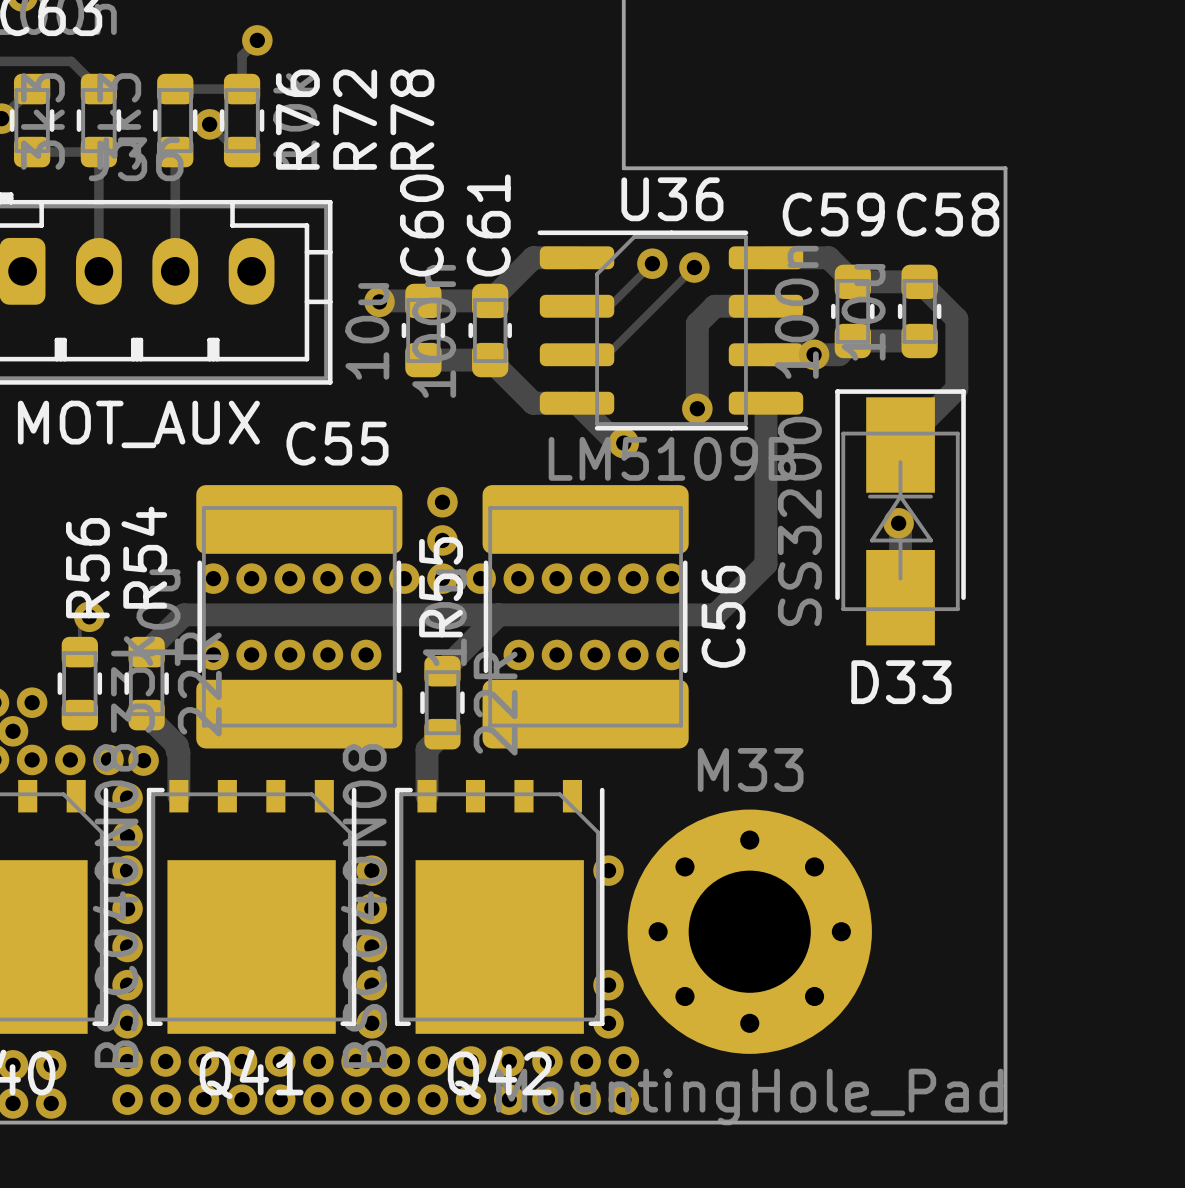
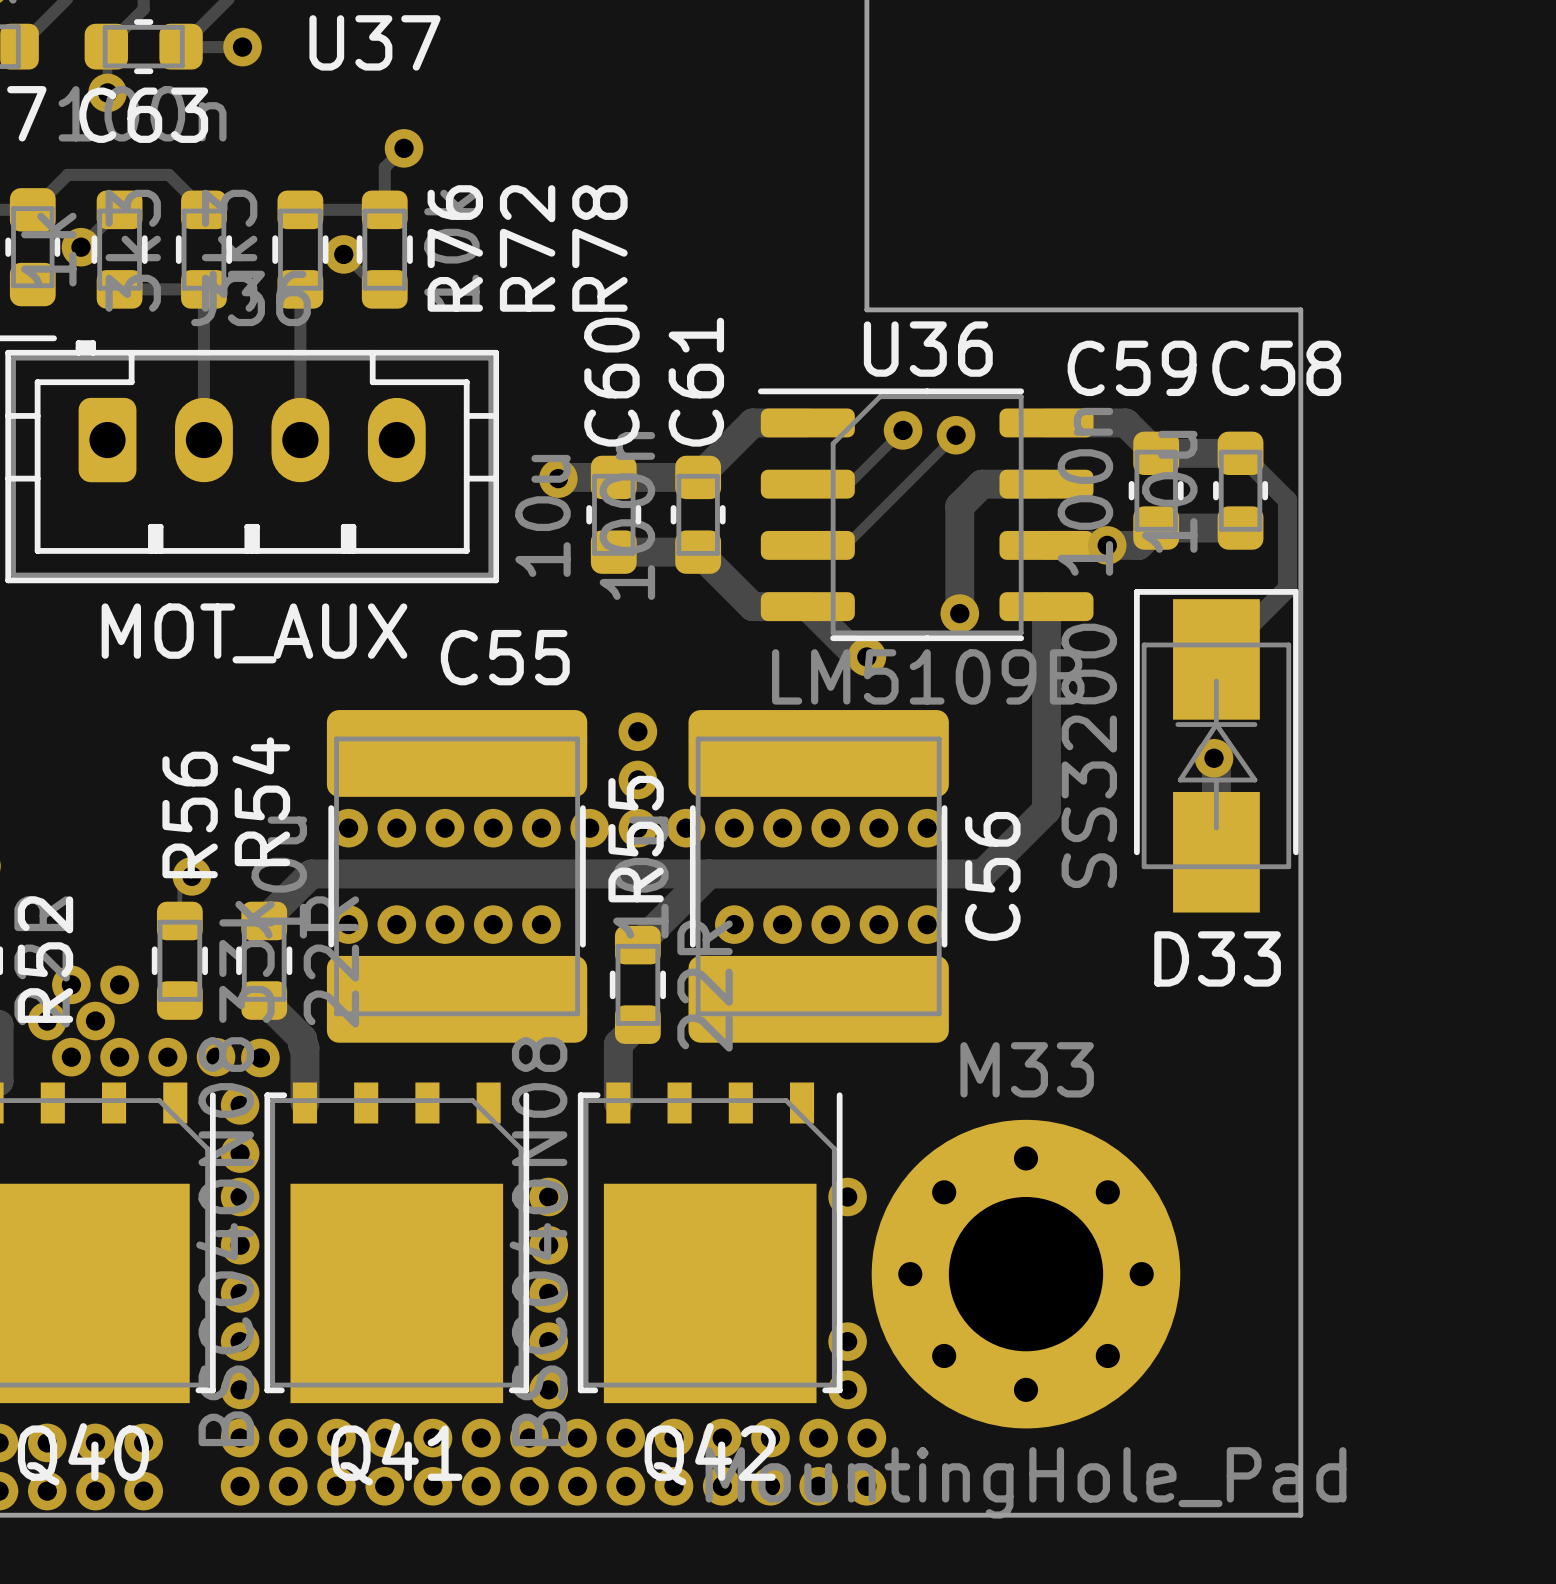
board edge: (967, 168) (1005, 168) (1005, 1122) (967, 1122) -> (1300, 309) (1300, 1515)
track width: thick (919, 281) (956, 319) (956, 388) (900, 445) -> thin (1240, 453) (1287, 500) (1287, 588) (1216, 659)

